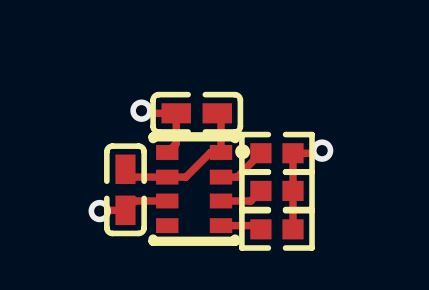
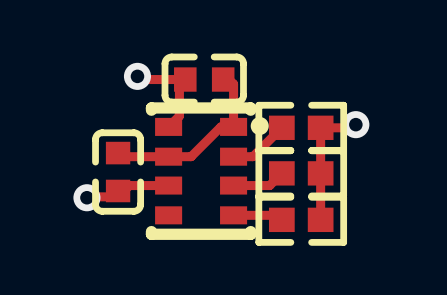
part footprint: [150, 91, 244, 135] -> [161, 53, 247, 106]
part footprint: [104, 143, 147, 237] -> [92, 129, 145, 215]

